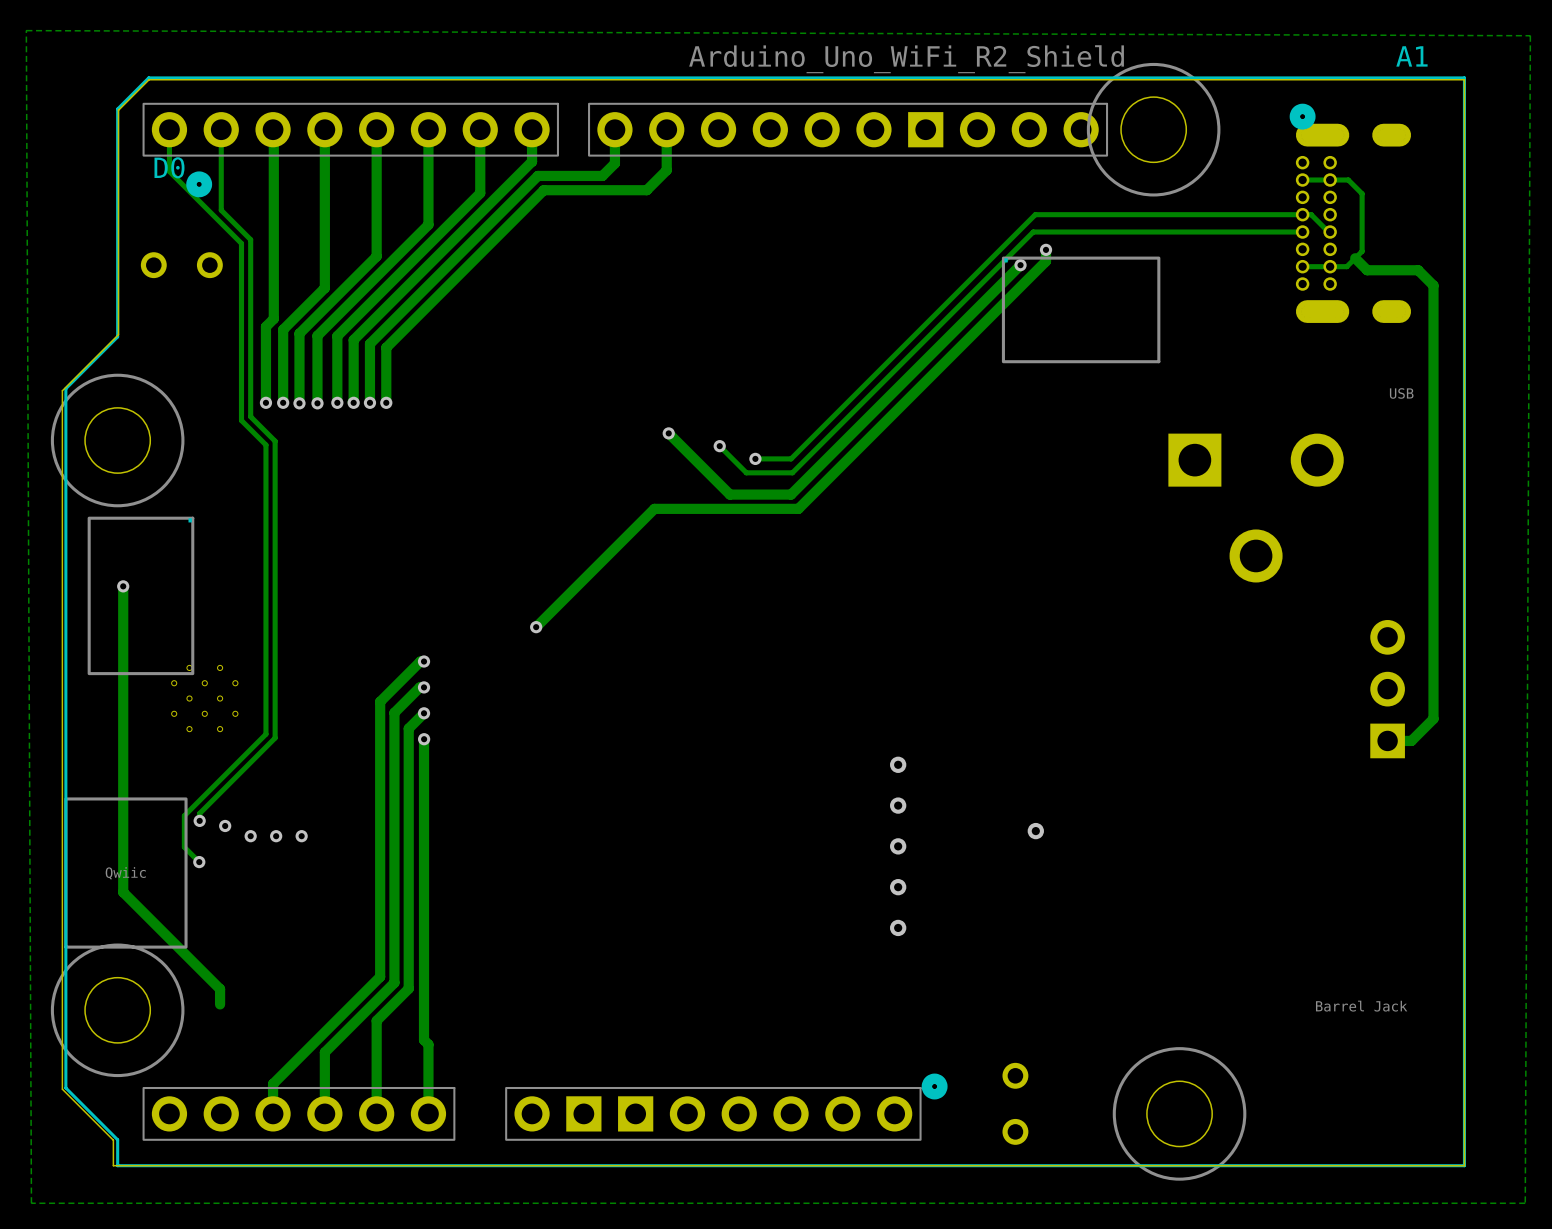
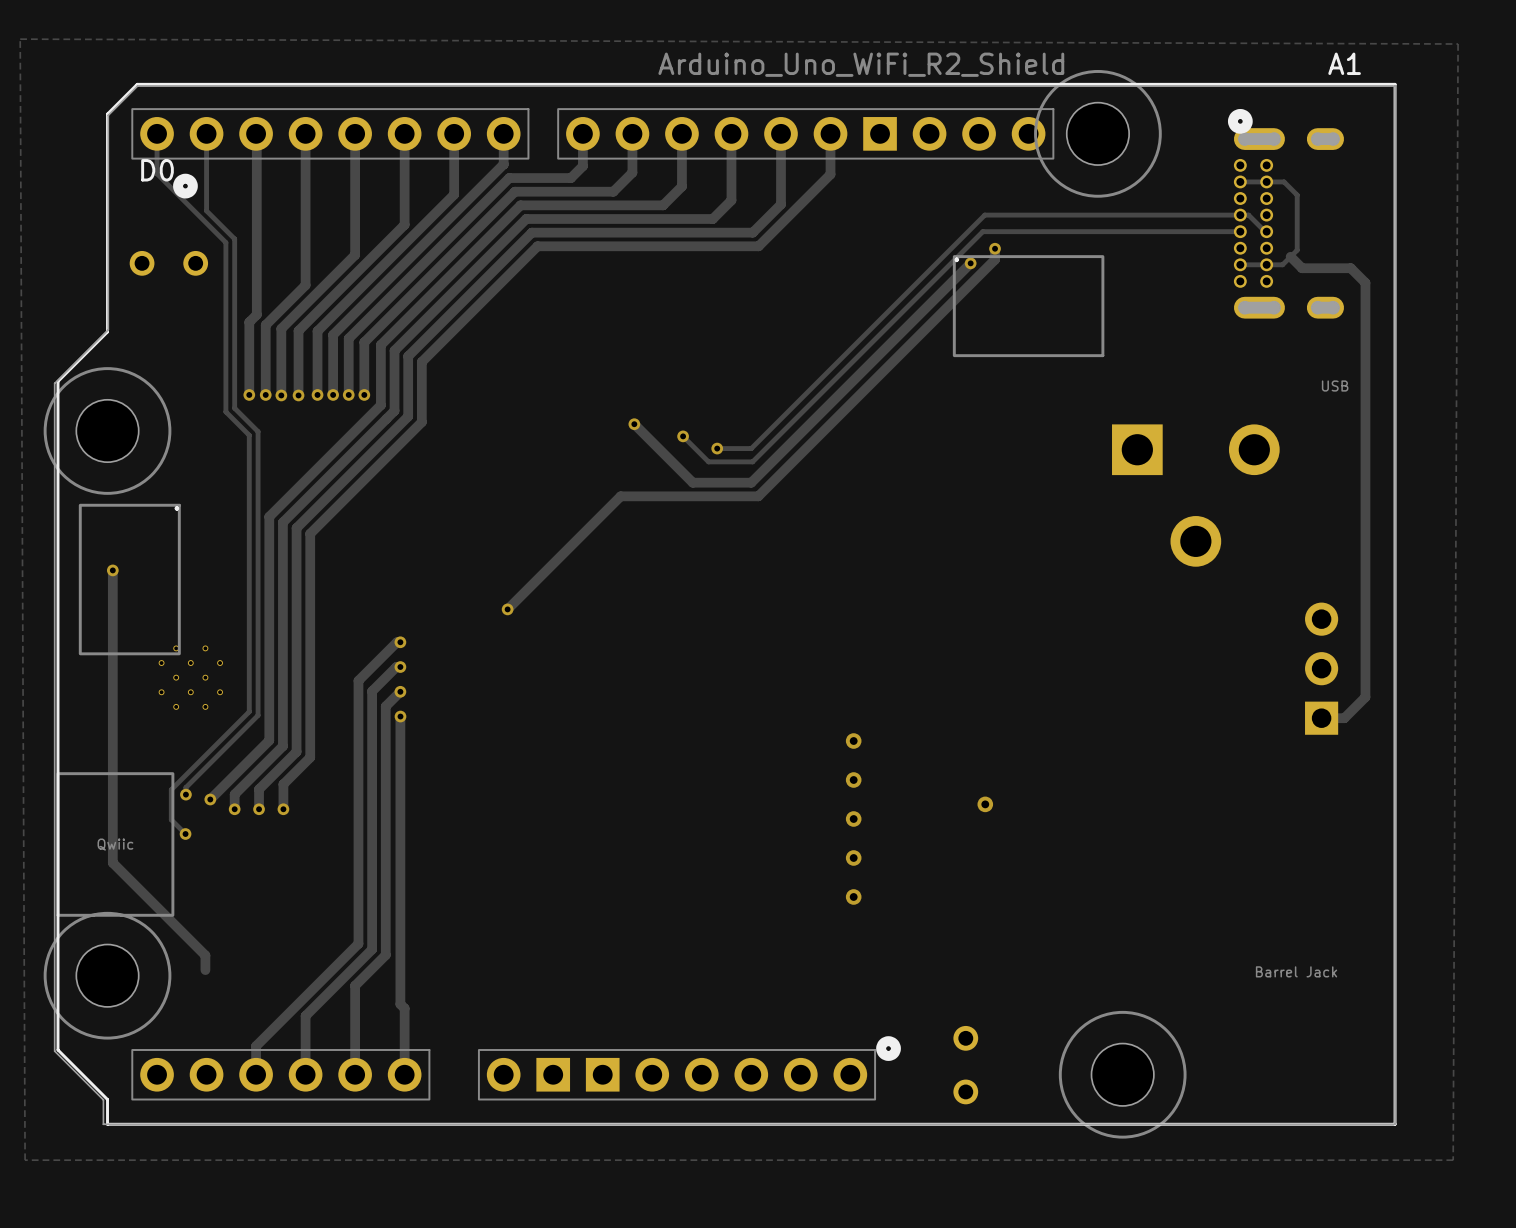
track: none -> (681, 133) (681, 186) (663, 205) (520, 205) (380, 345) (380, 405) (269, 516) (269, 740) (210, 799)
track: none -> (731, 133) (731, 200) (712, 219) (526, 219) (394, 350) (394, 410) (282, 522) (282, 746) (234, 794) (234, 809)
track: none -> (781, 133) (781, 204) (752, 232) (531, 232) (408, 356) (408, 416) (296, 528) (296, 751) (259, 789) (259, 809)
track: none -> (830, 133) (830, 174) (758, 246) (537, 246) (421, 361) (421, 422) (310, 533) (310, 757) (283, 784) (283, 809)

